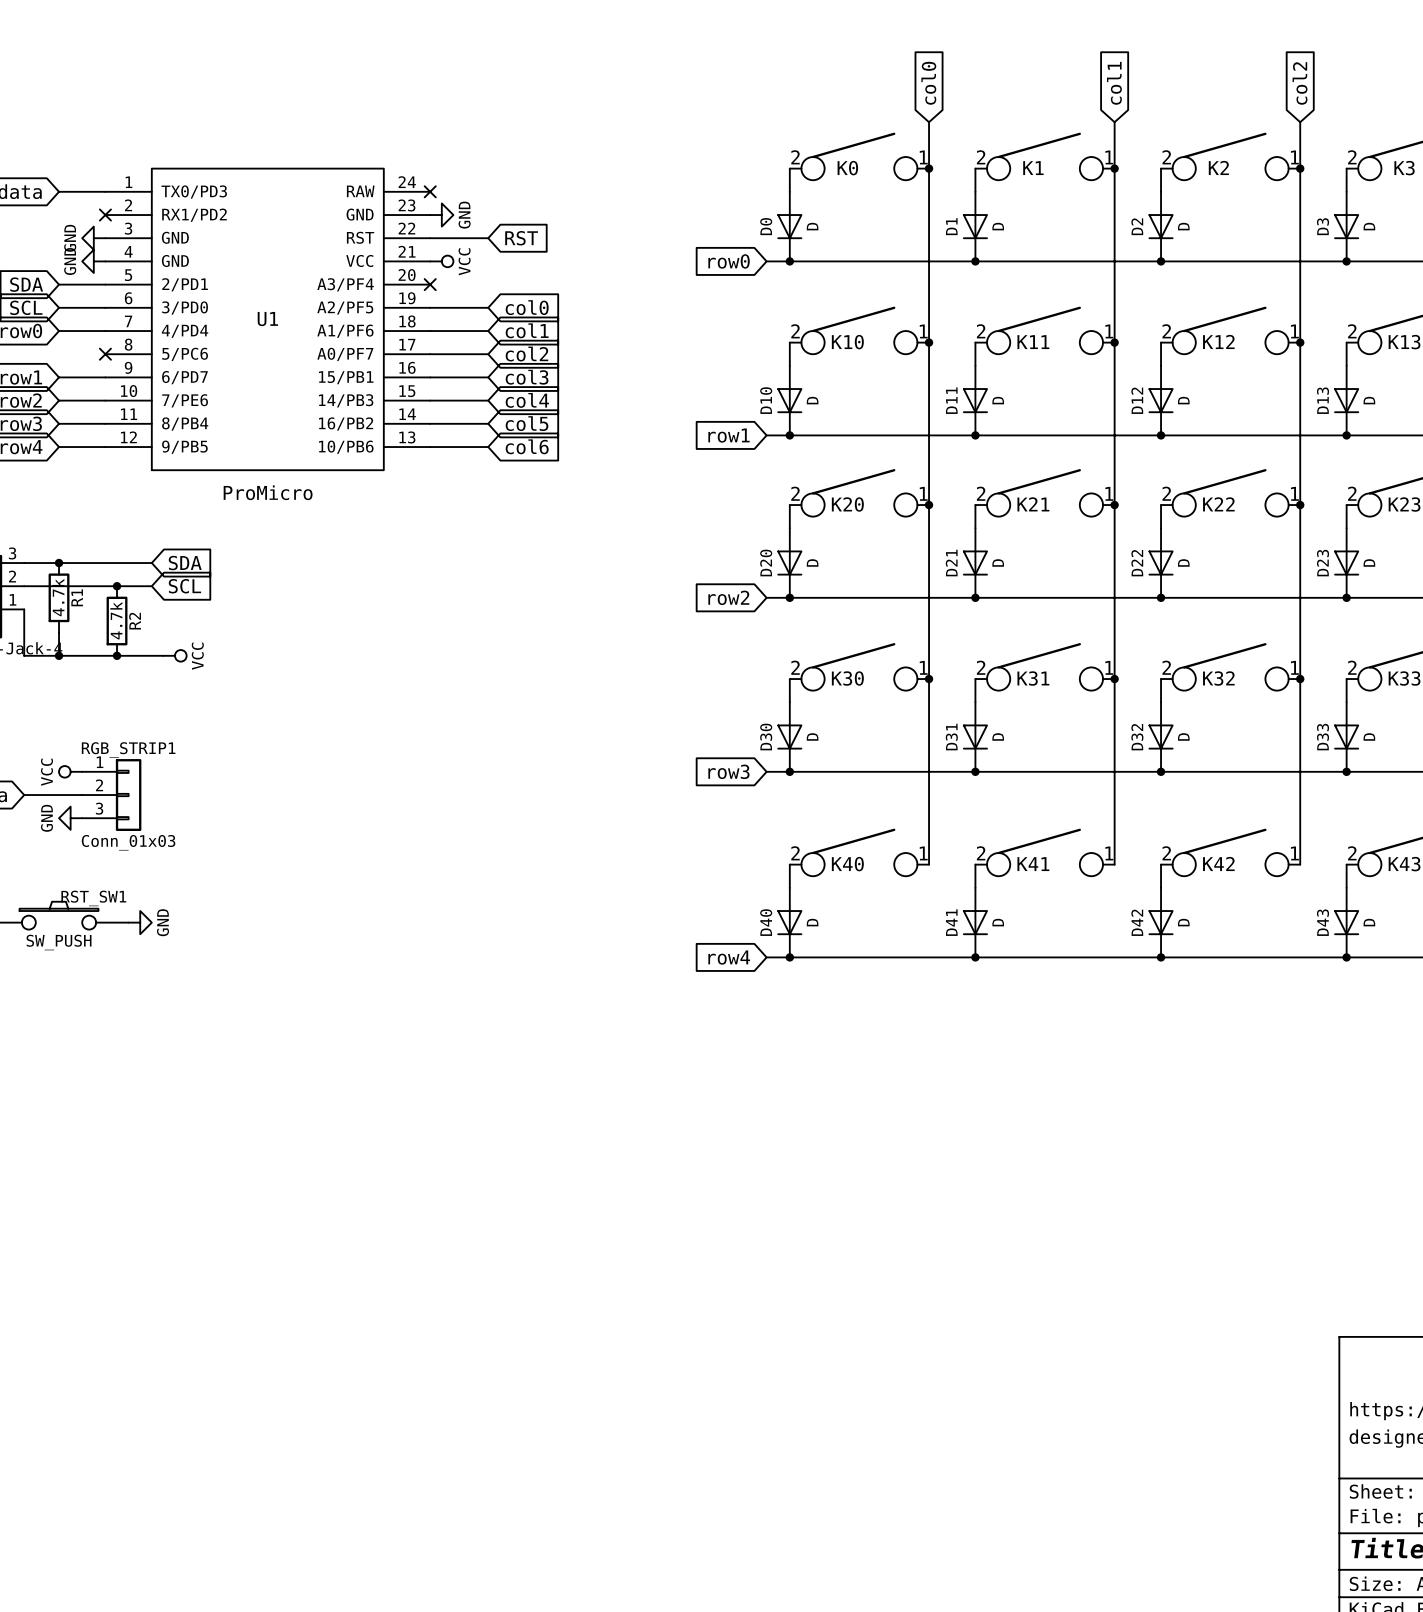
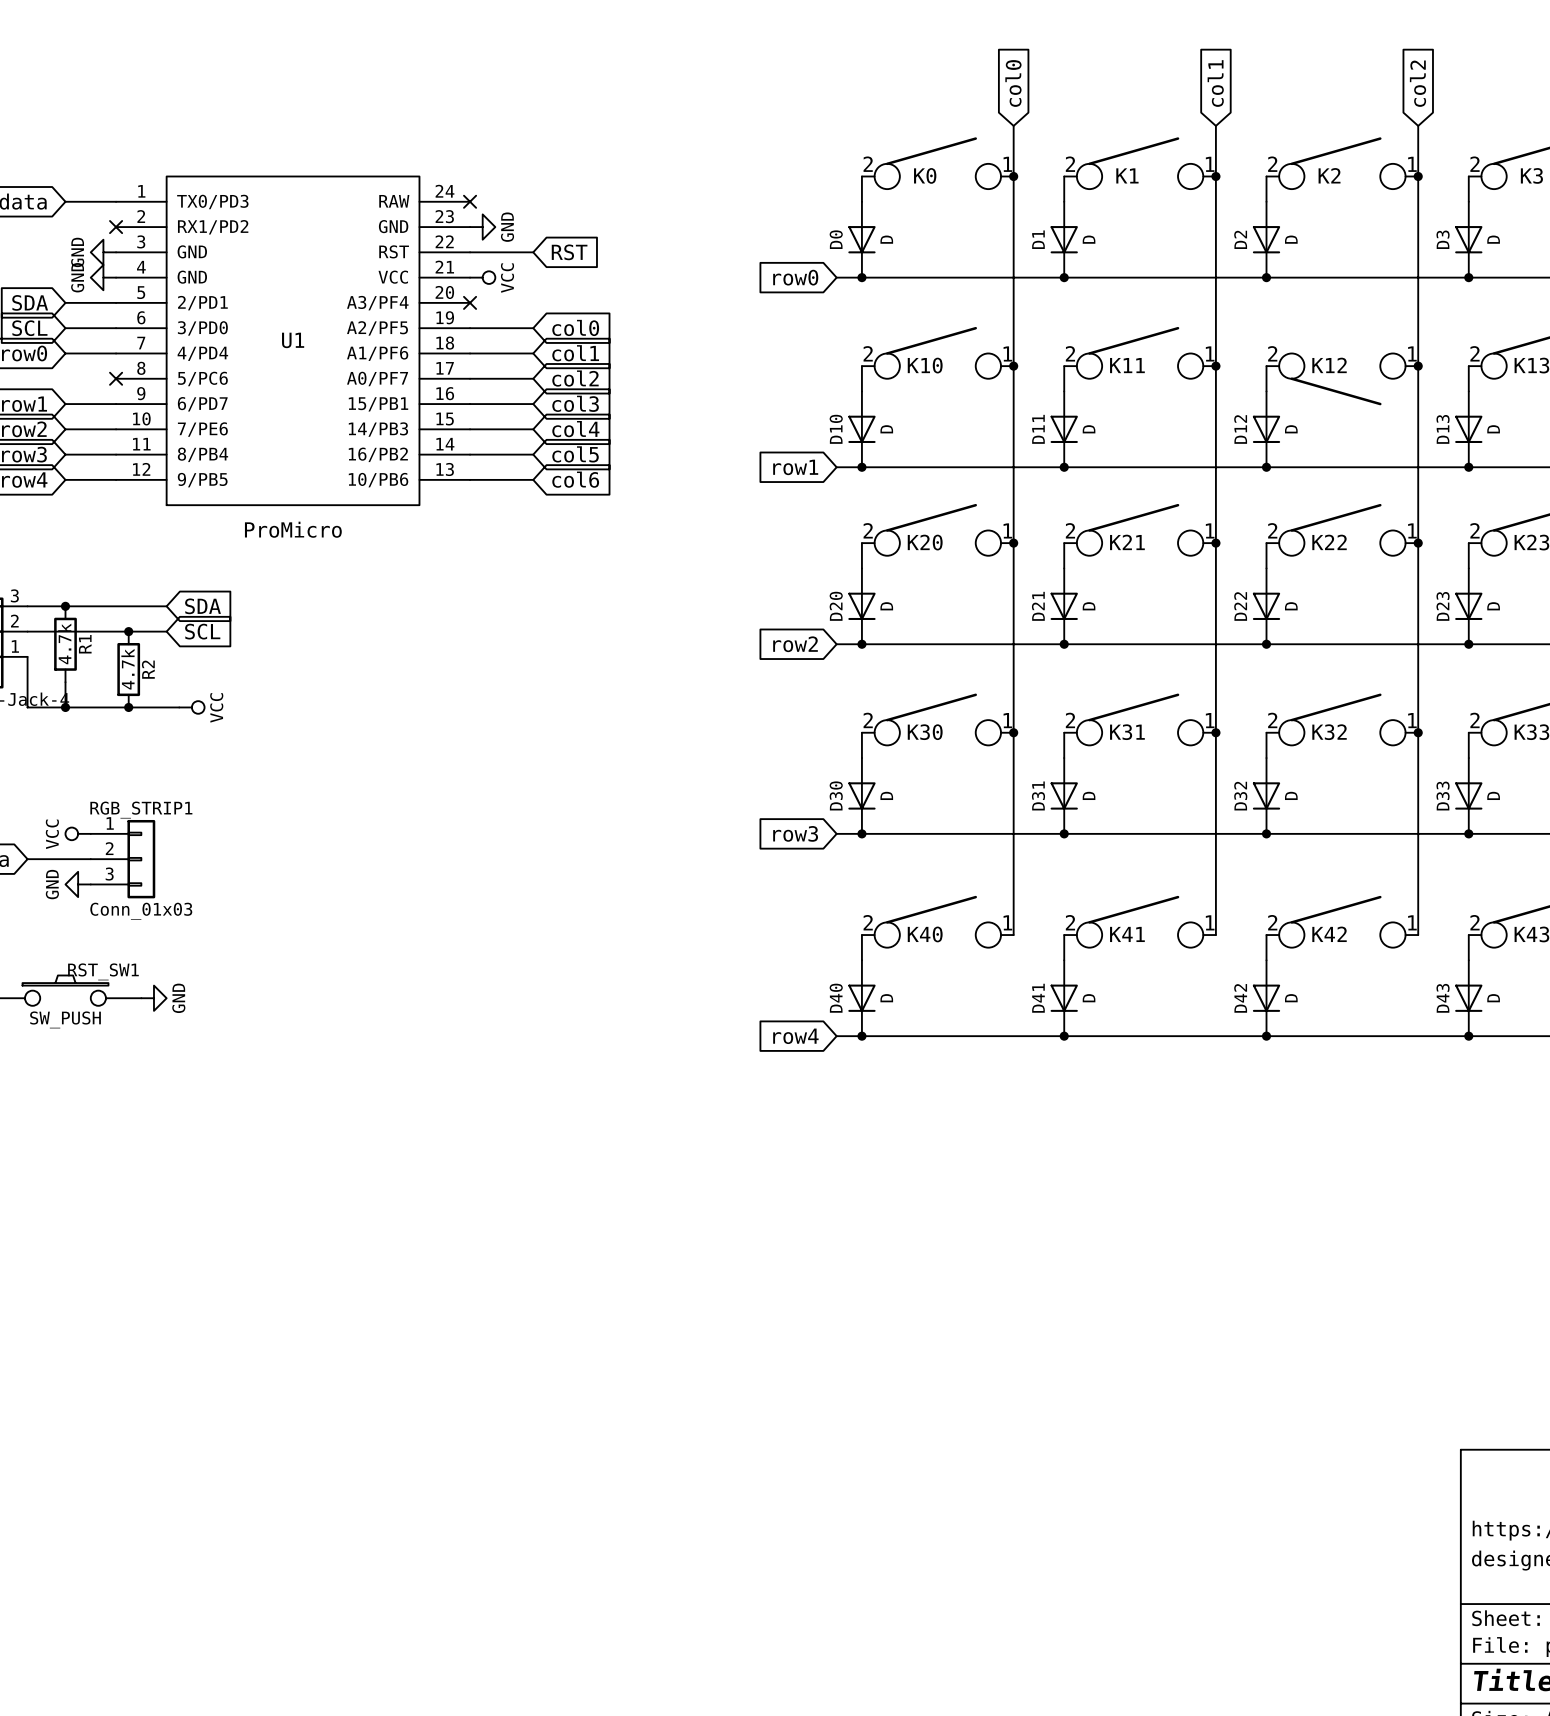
K12 flip: as is (1230, 330) -> up-down (1342, 379)

